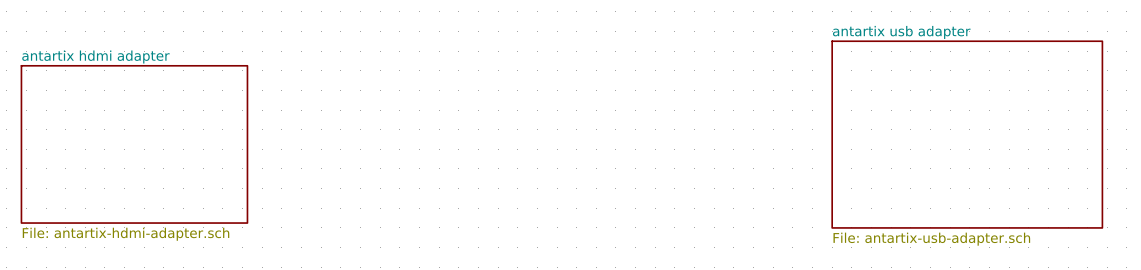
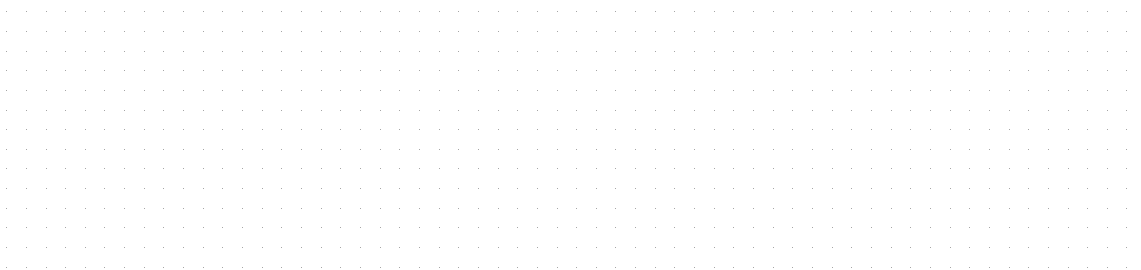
sheet antartix usb adapter: File: antartix-usb-adapter.sch (967, 134) -> none
sheet antartix hdmi adapter: File: antartix-hdmi-adapter.sch (134, 144) -> none

